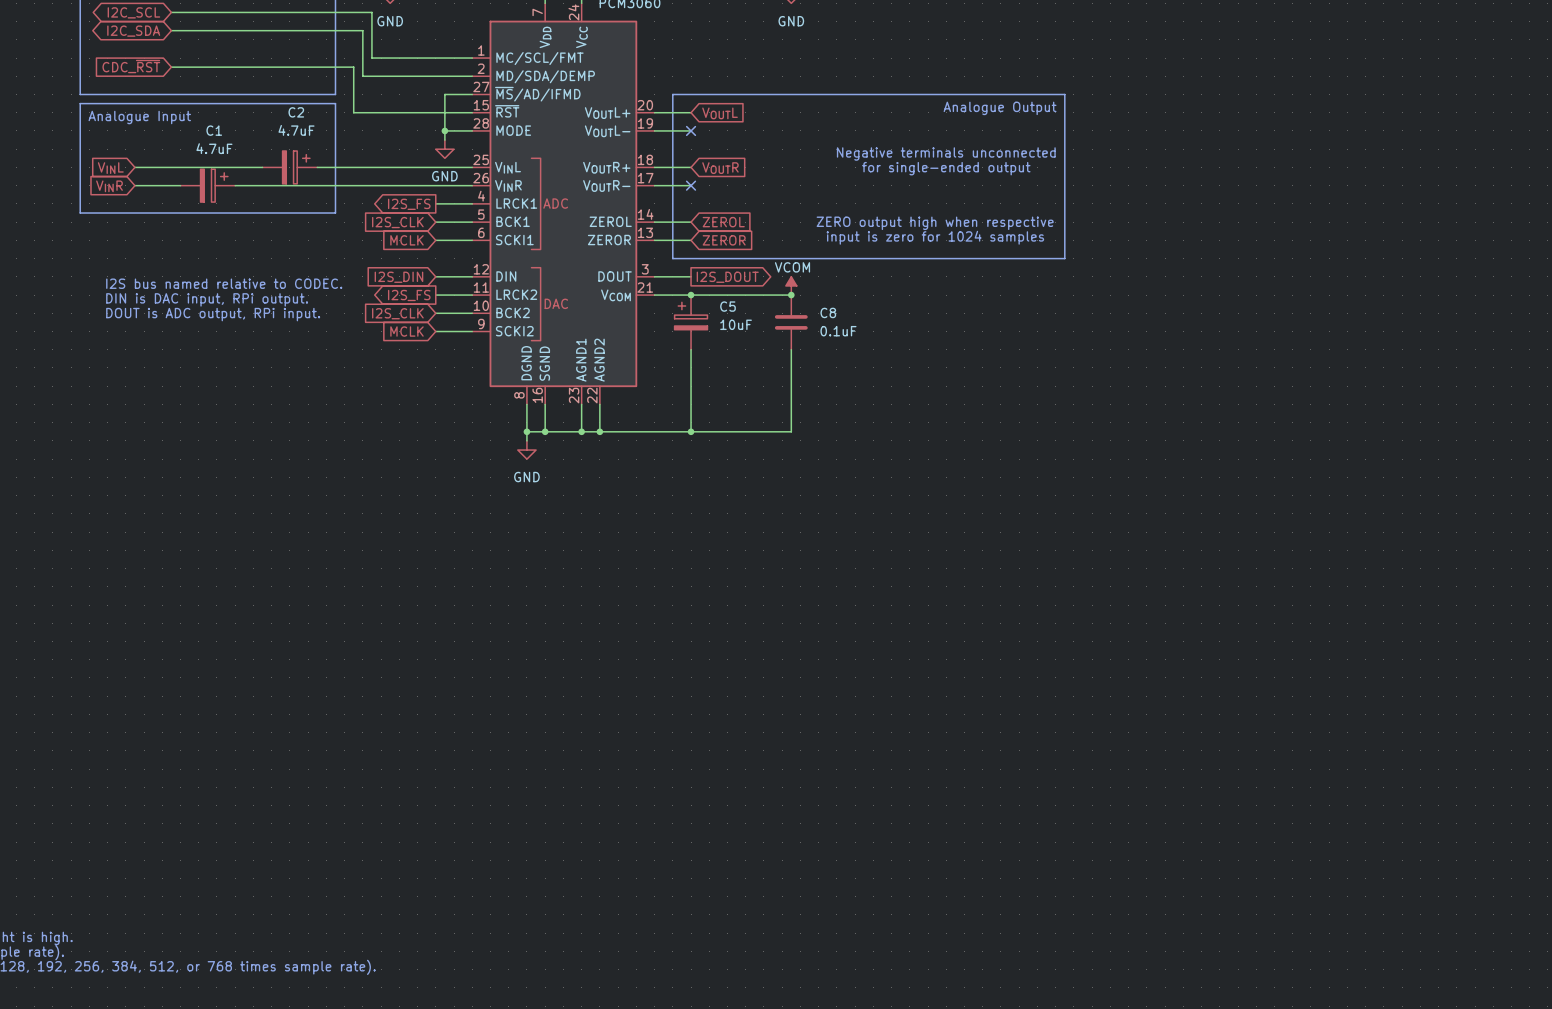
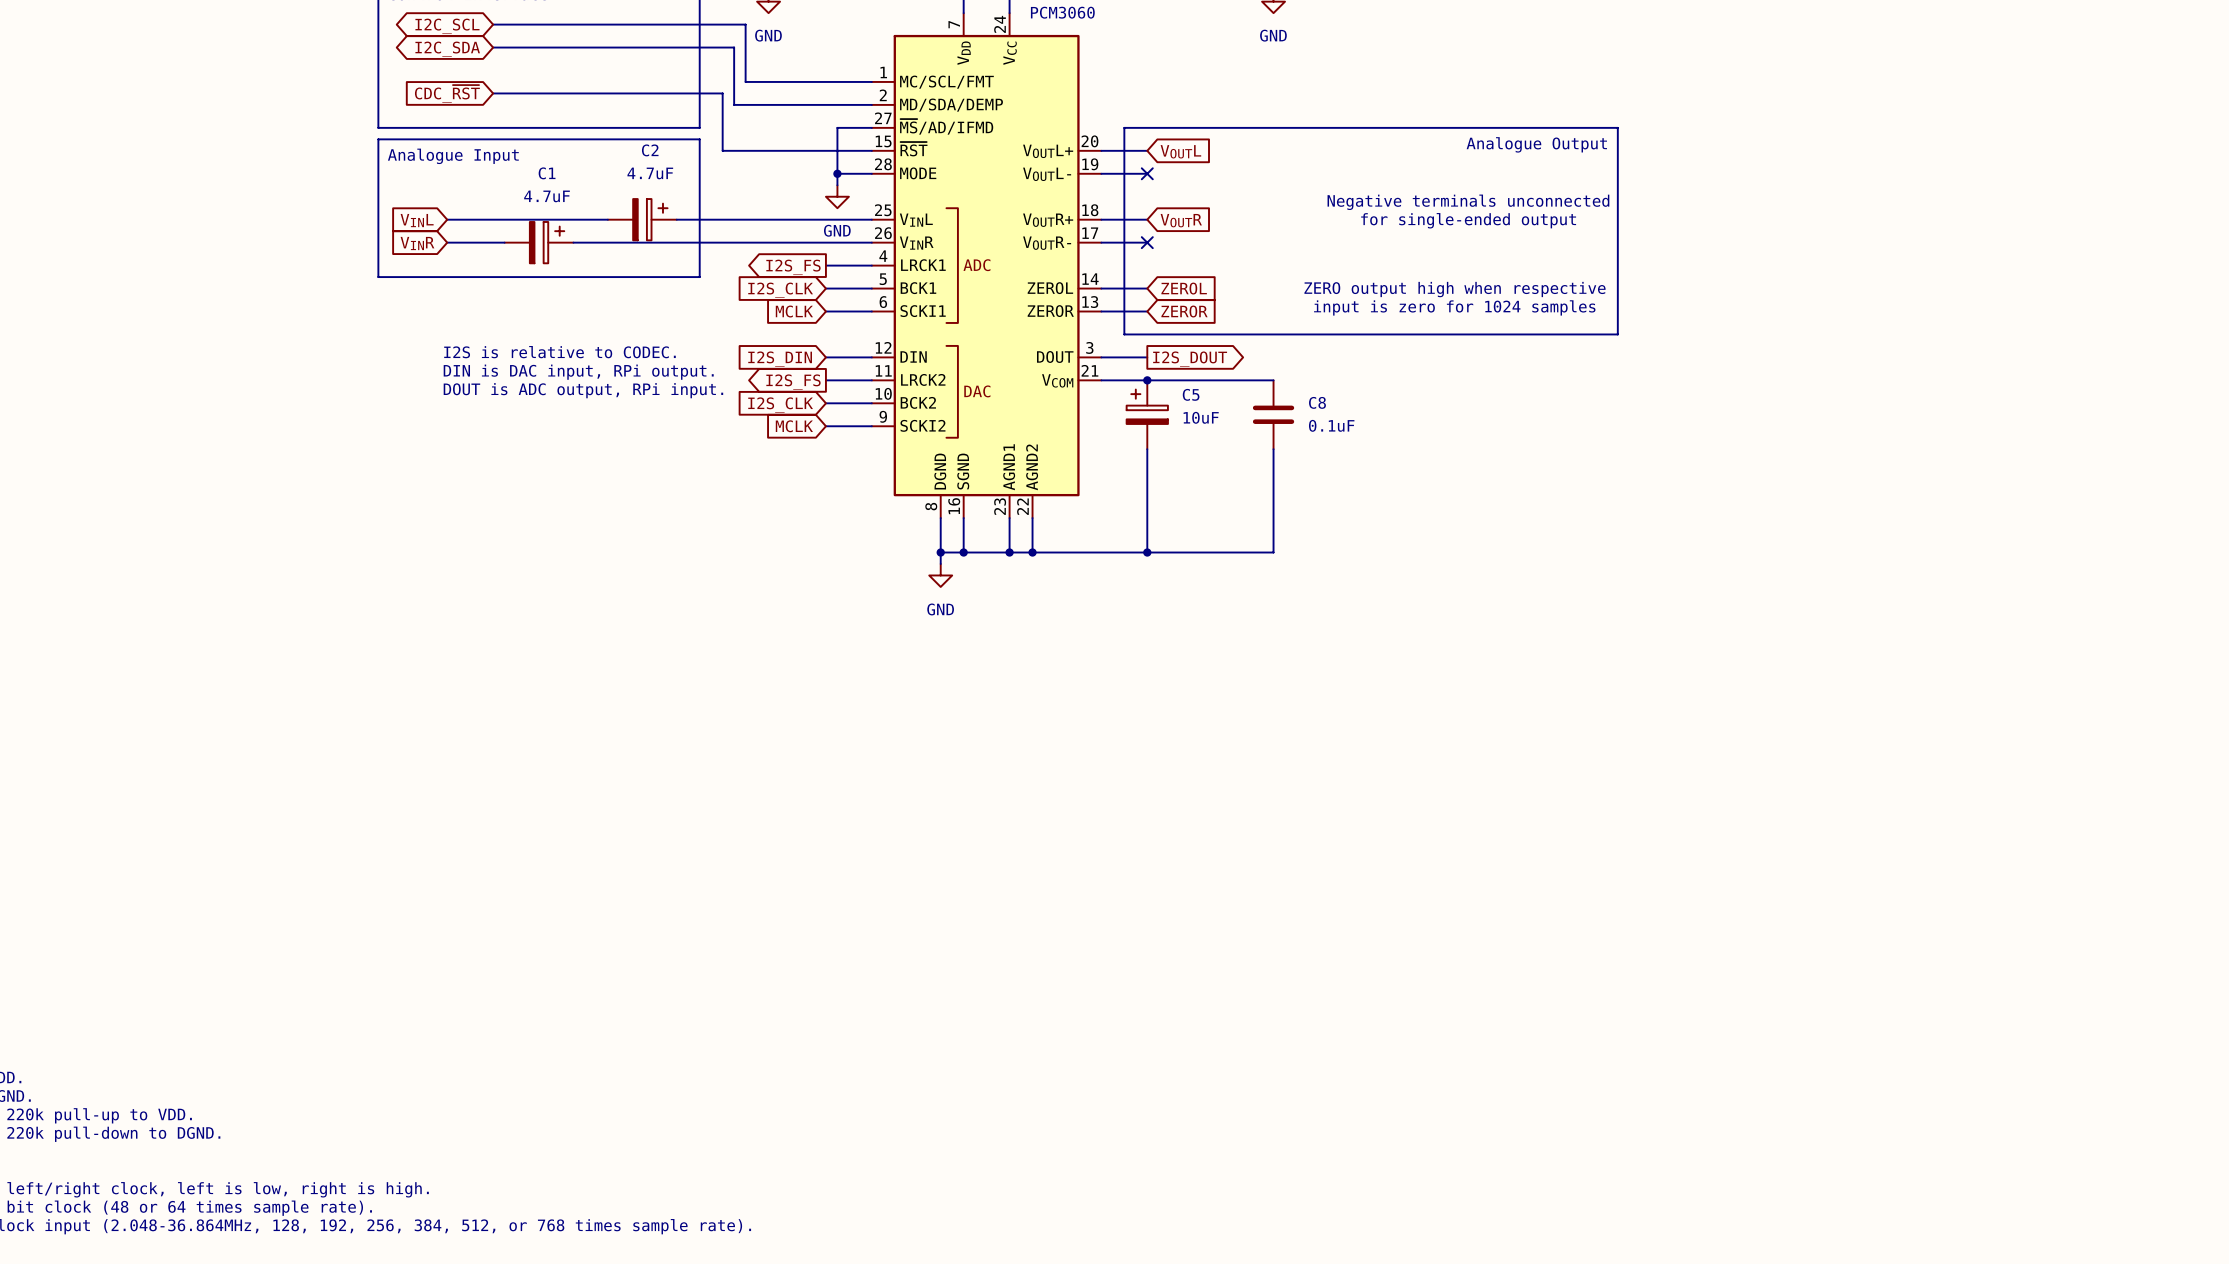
text: I2S bus named relative to CODEC. (224, 283) -> I2S is relative to CODEC. (559, 352)
power symbol: VCOM (791, 285) -> none
junction: (791, 295) -> none
text position: DIN is DAC input, RPi output. (207, 299) -> DIN is DAC input, RPi output. (578, 372)
text position: DOUT is ADC output, RPi input. (213, 314) -> DOUT is ADC output, RPi input. (583, 390)

